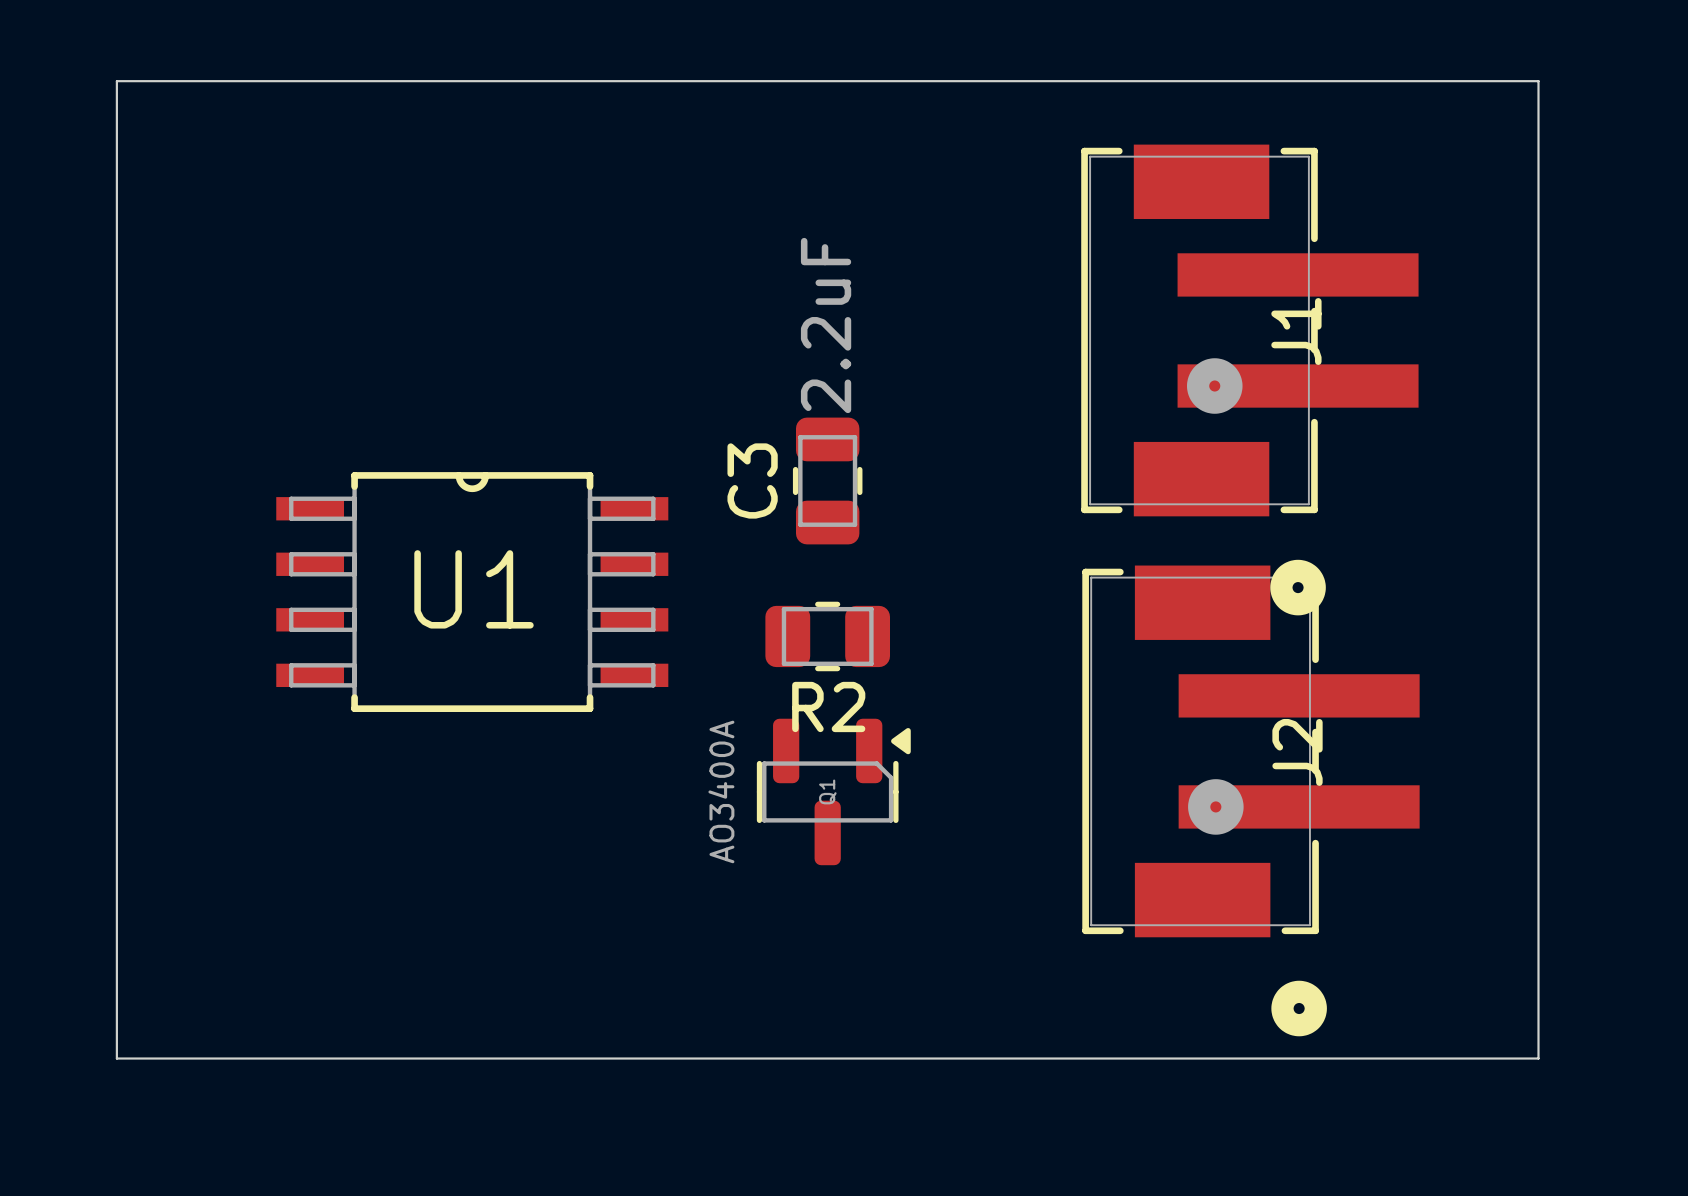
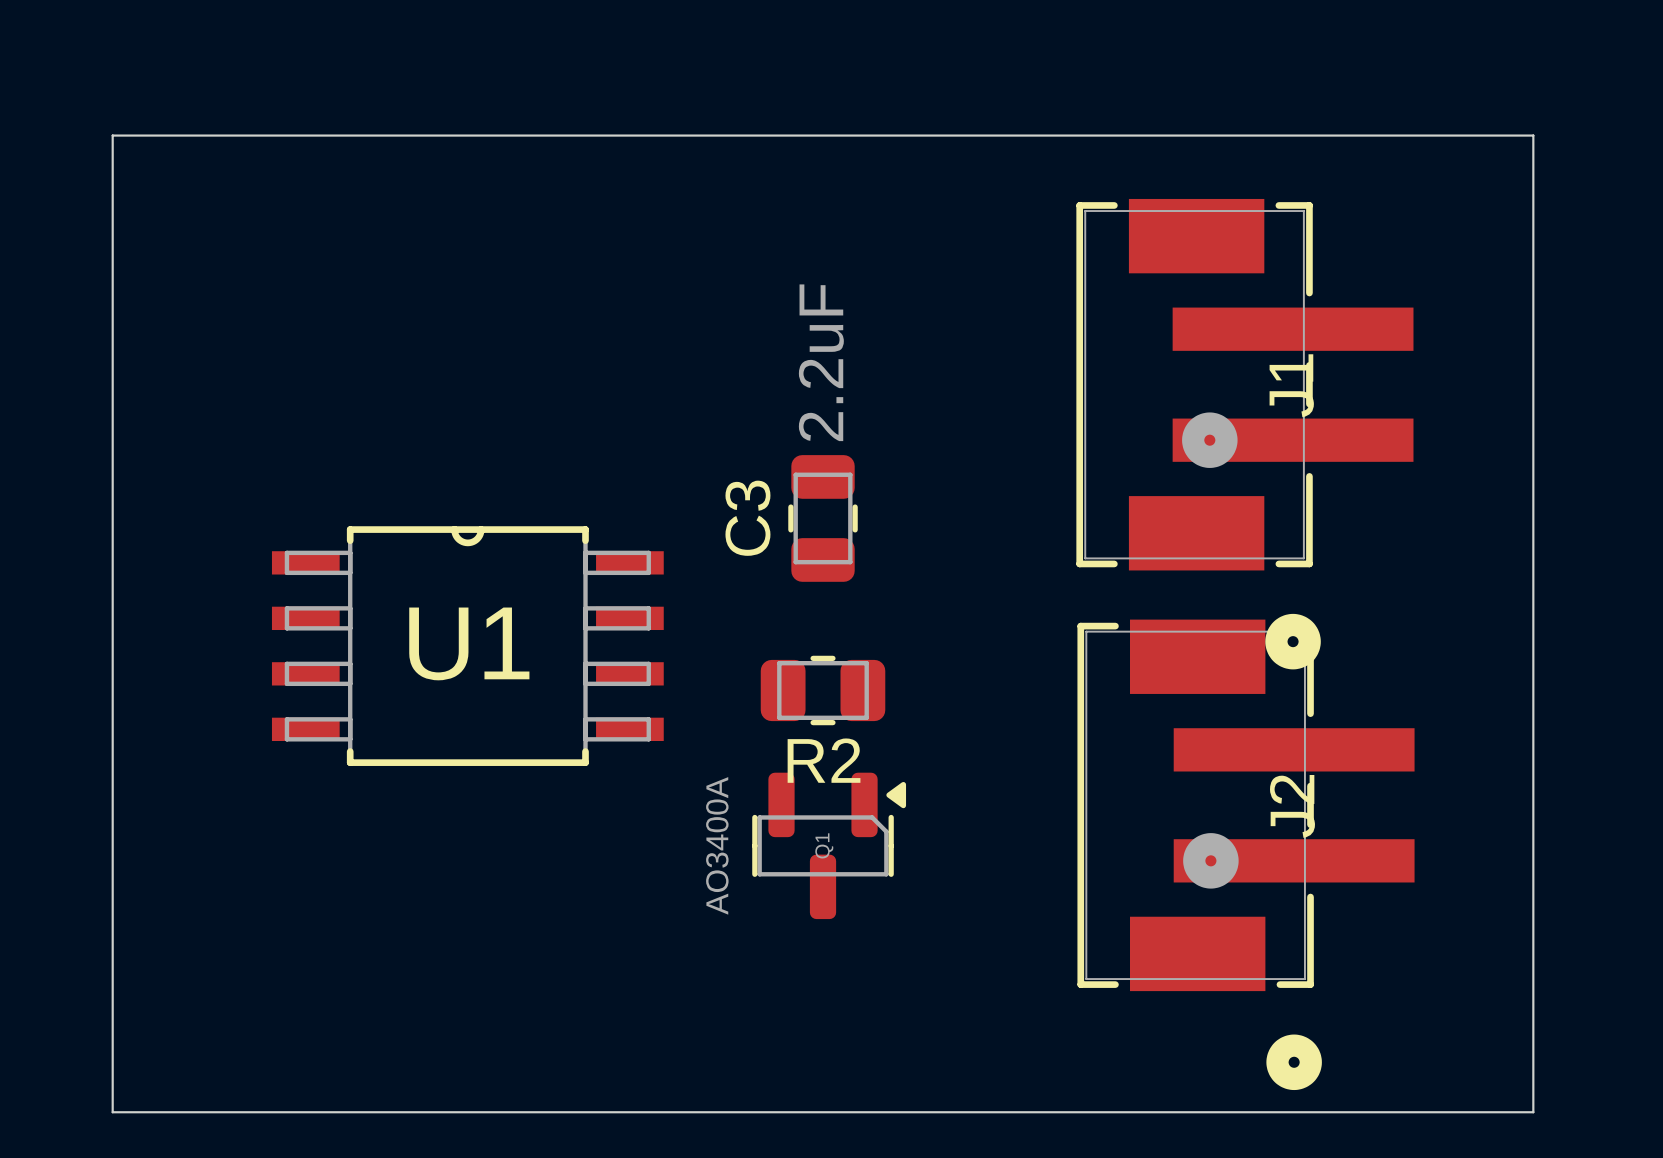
C3 position: (827, 480) -> (823, 518)

